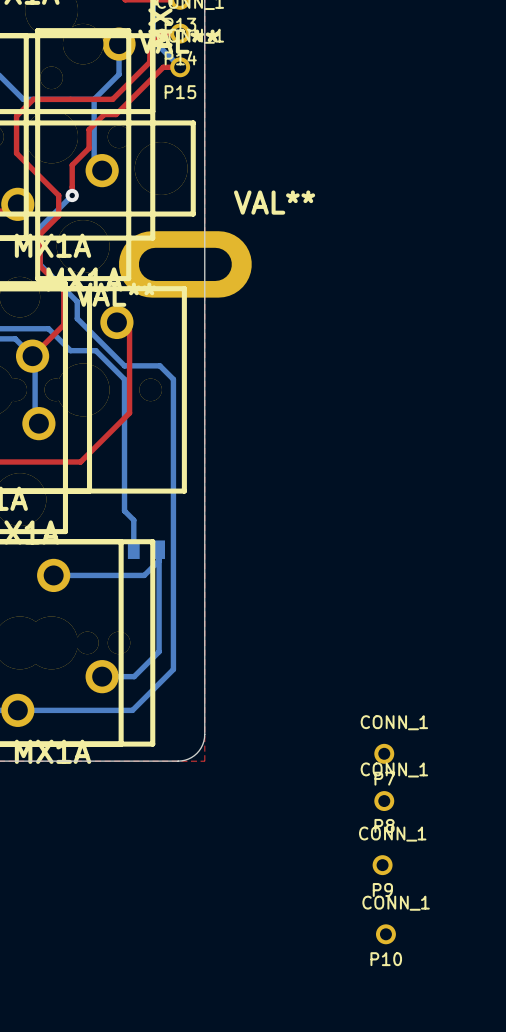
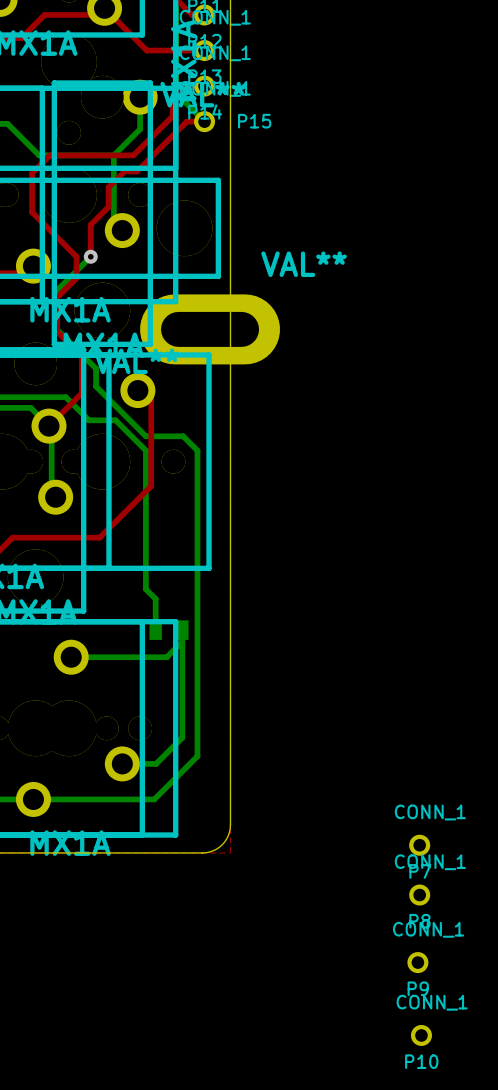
P15 name position: P15 (180, 92) -> P15 (254, 121)

